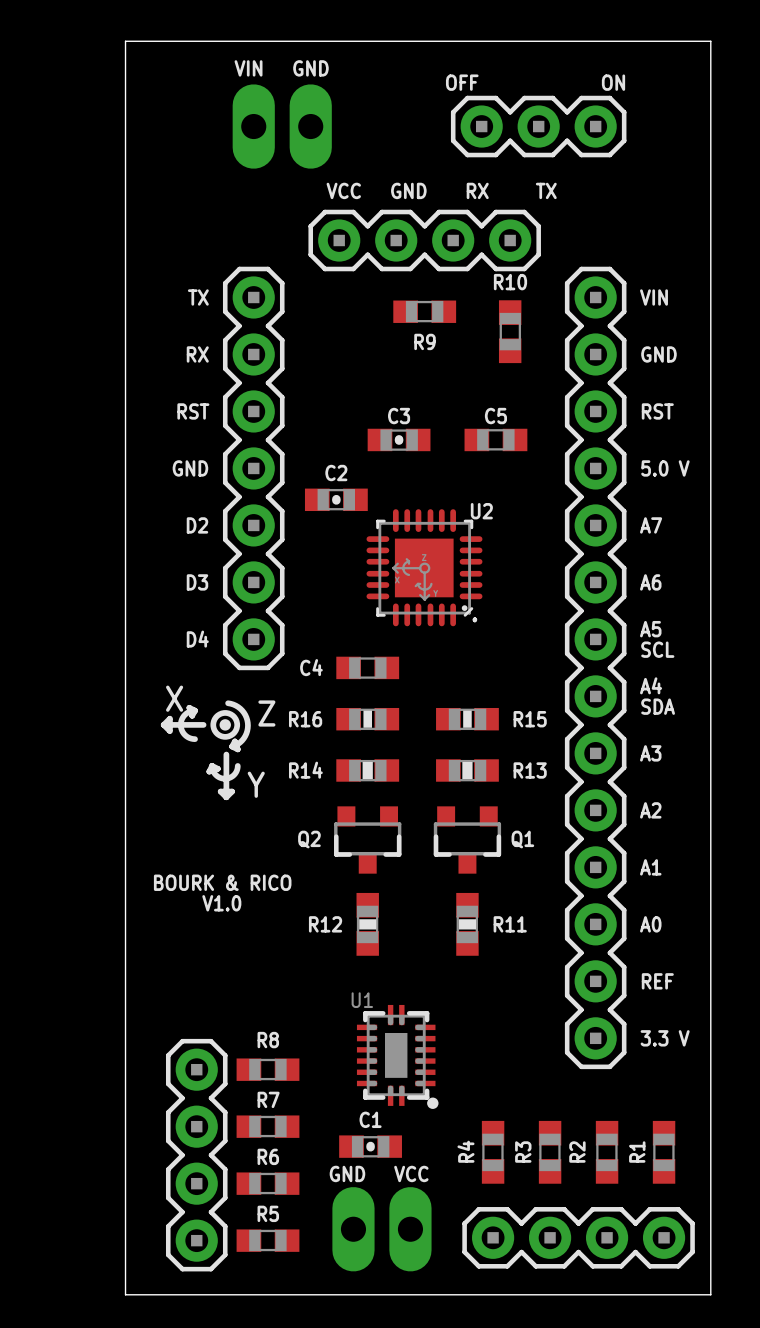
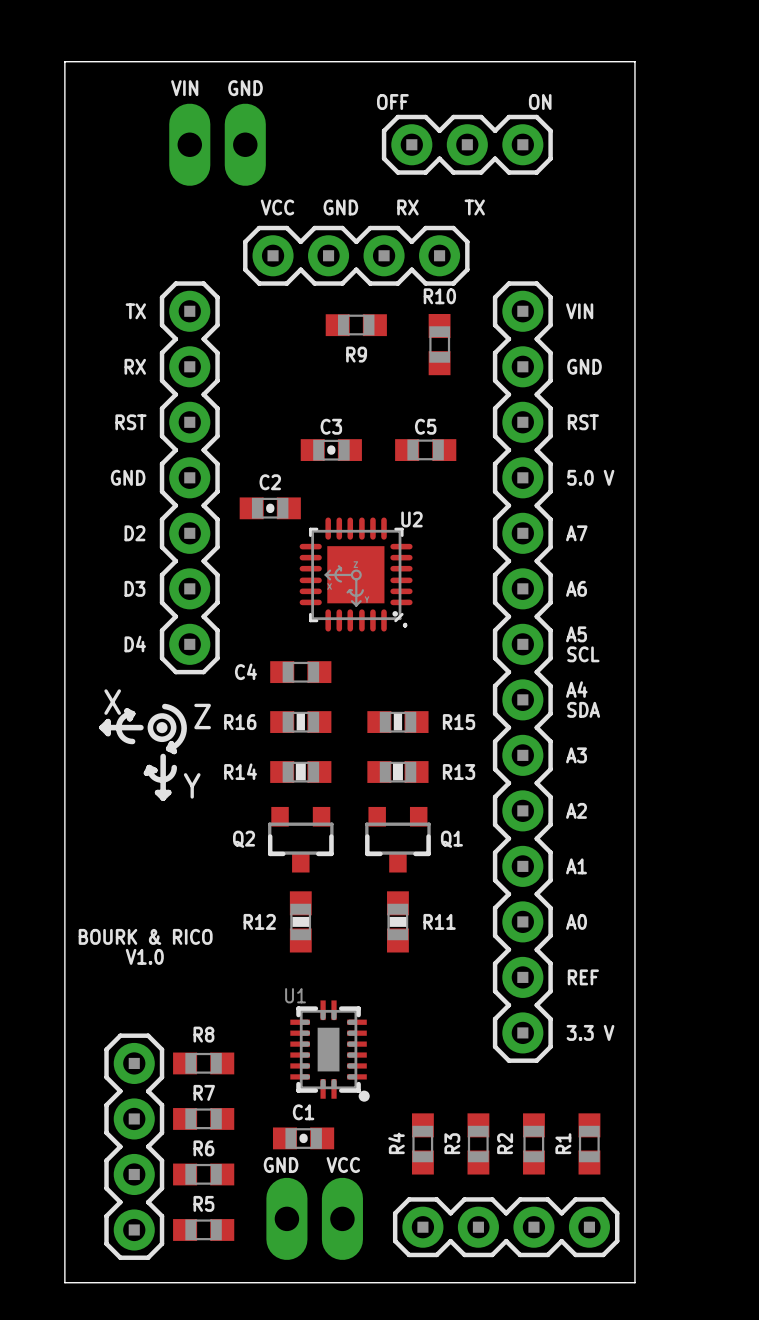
text position: BOURK & RICO (222, 882) -> BOURK & RICO (145, 936)
text position: V1.0 (221, 903) -> V1.0 (144, 956)

